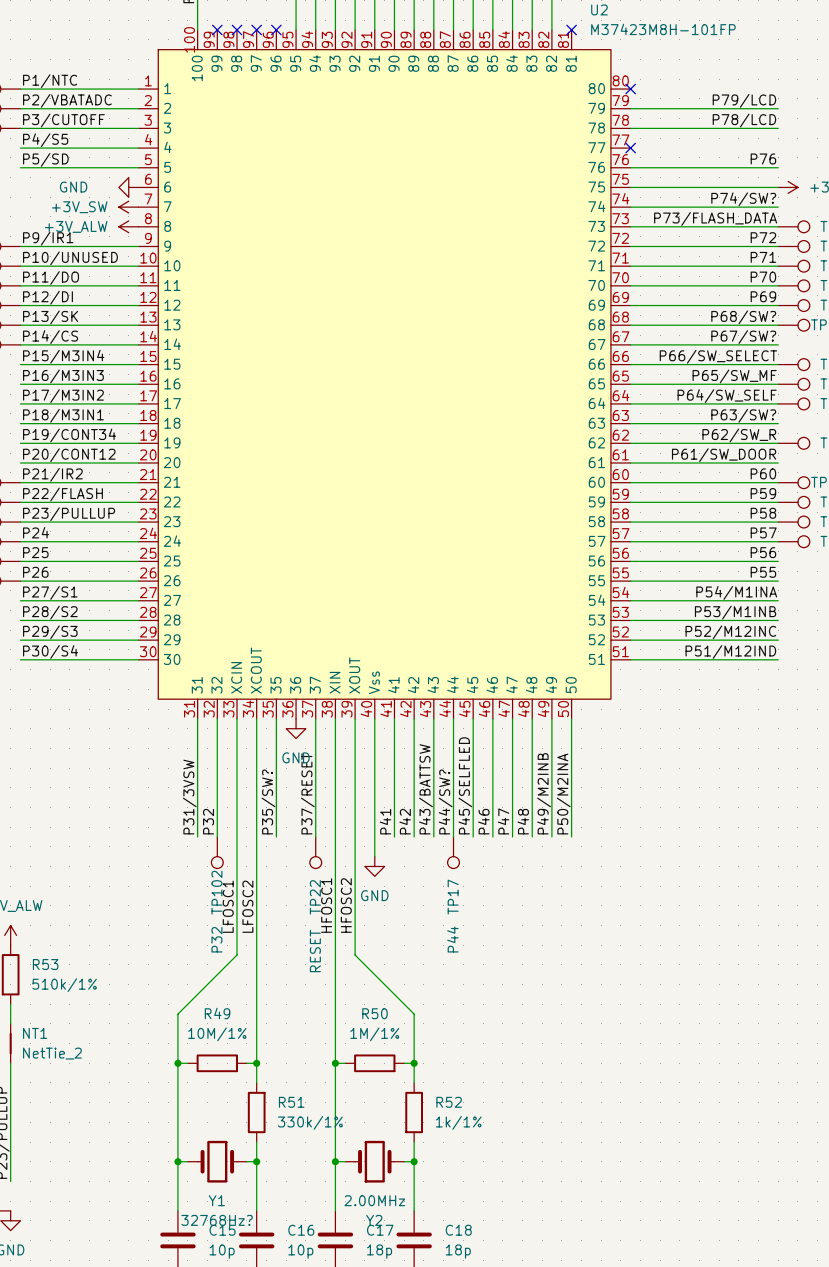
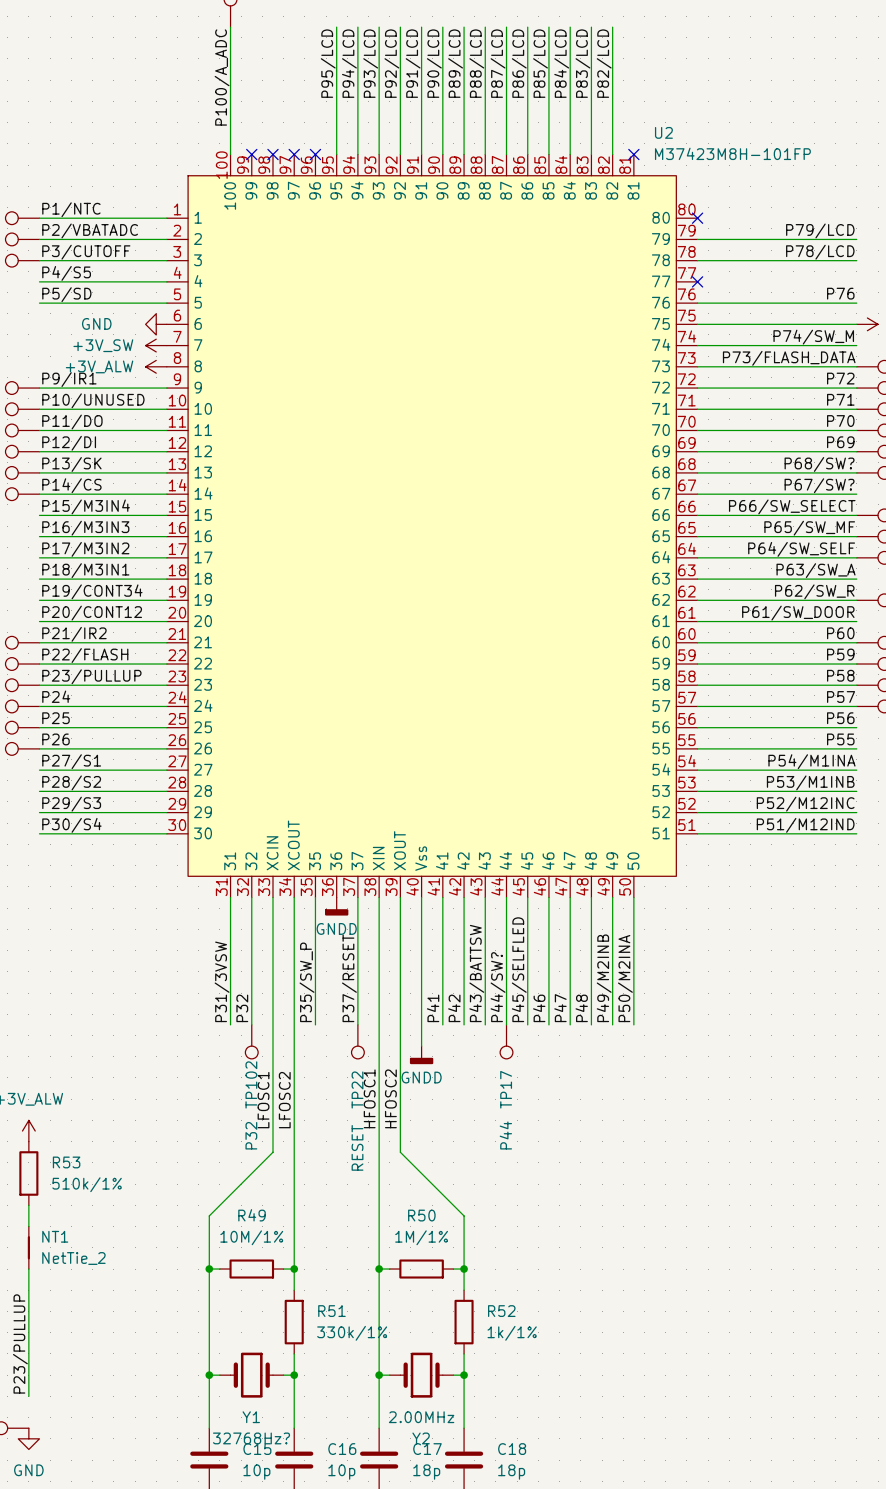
label: P74/SW? (743, 199) -> P74/SW_M (813, 337)
label: P63/SW? (743, 415) -> P63/SW_A (816, 570)
power symbol: GND (296, 728) -> GNDD (336, 906)
label: P35/SW? (268, 801) -> P35/SW_P (306, 982)
power symbol: GND (374, 866) -> GNDD (421, 1055)

